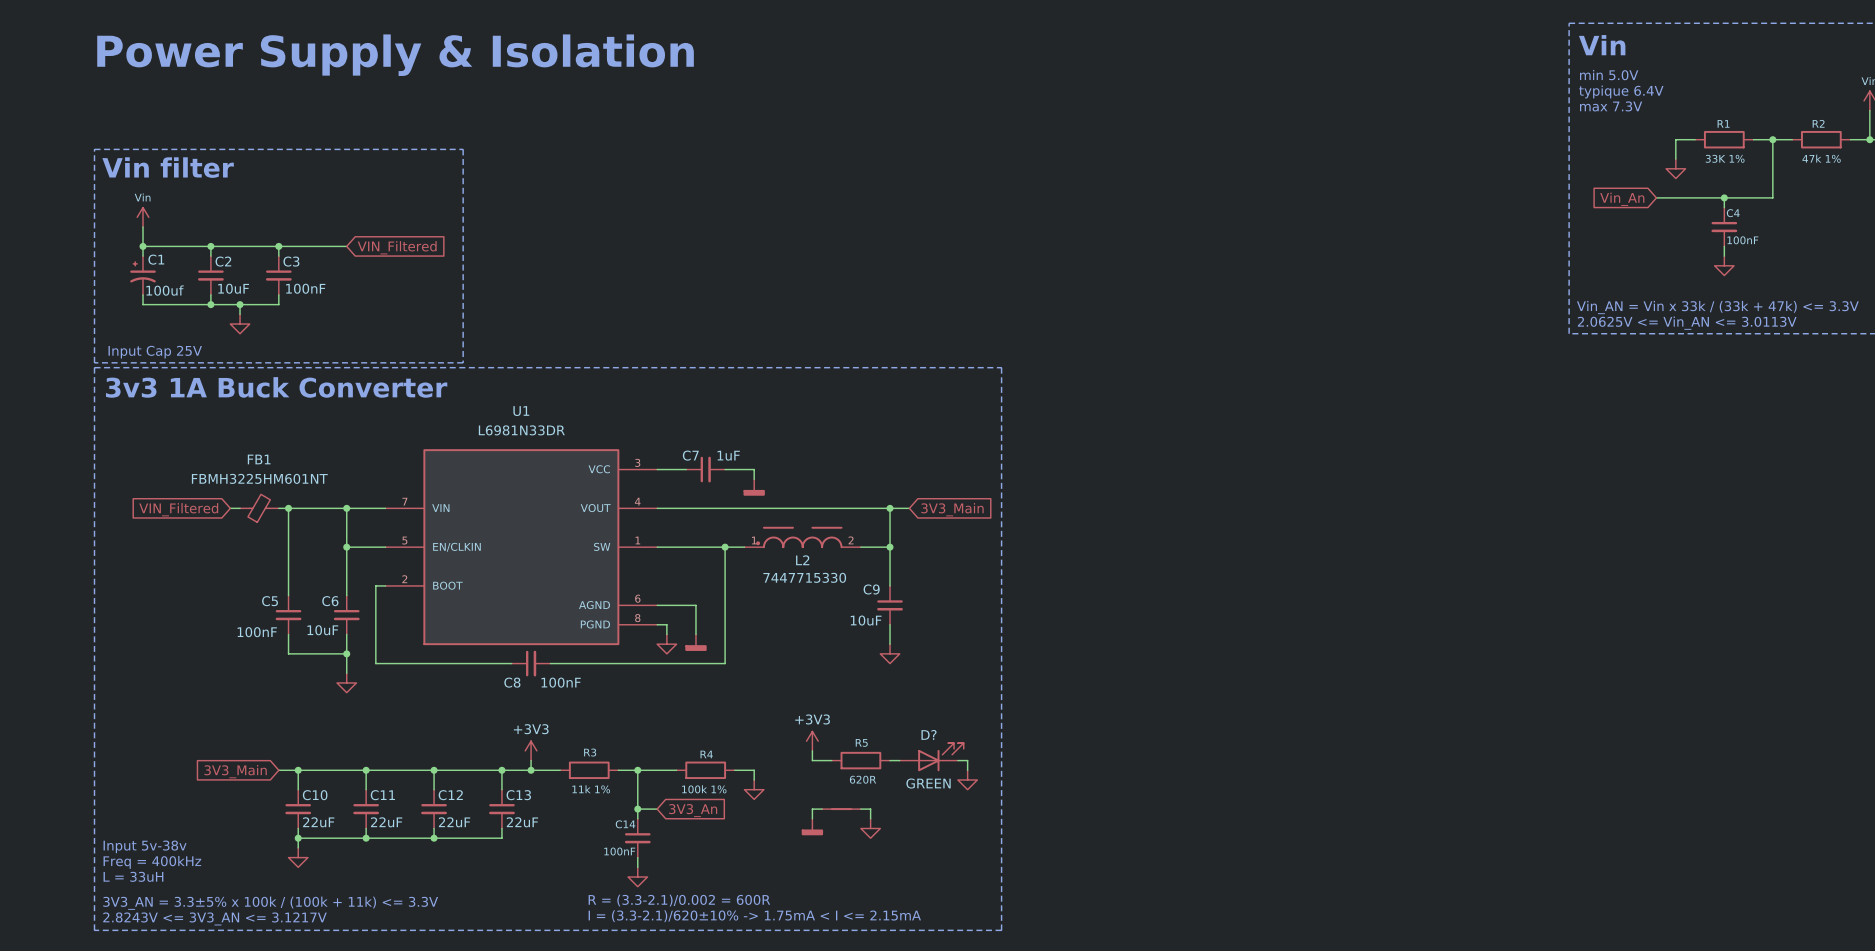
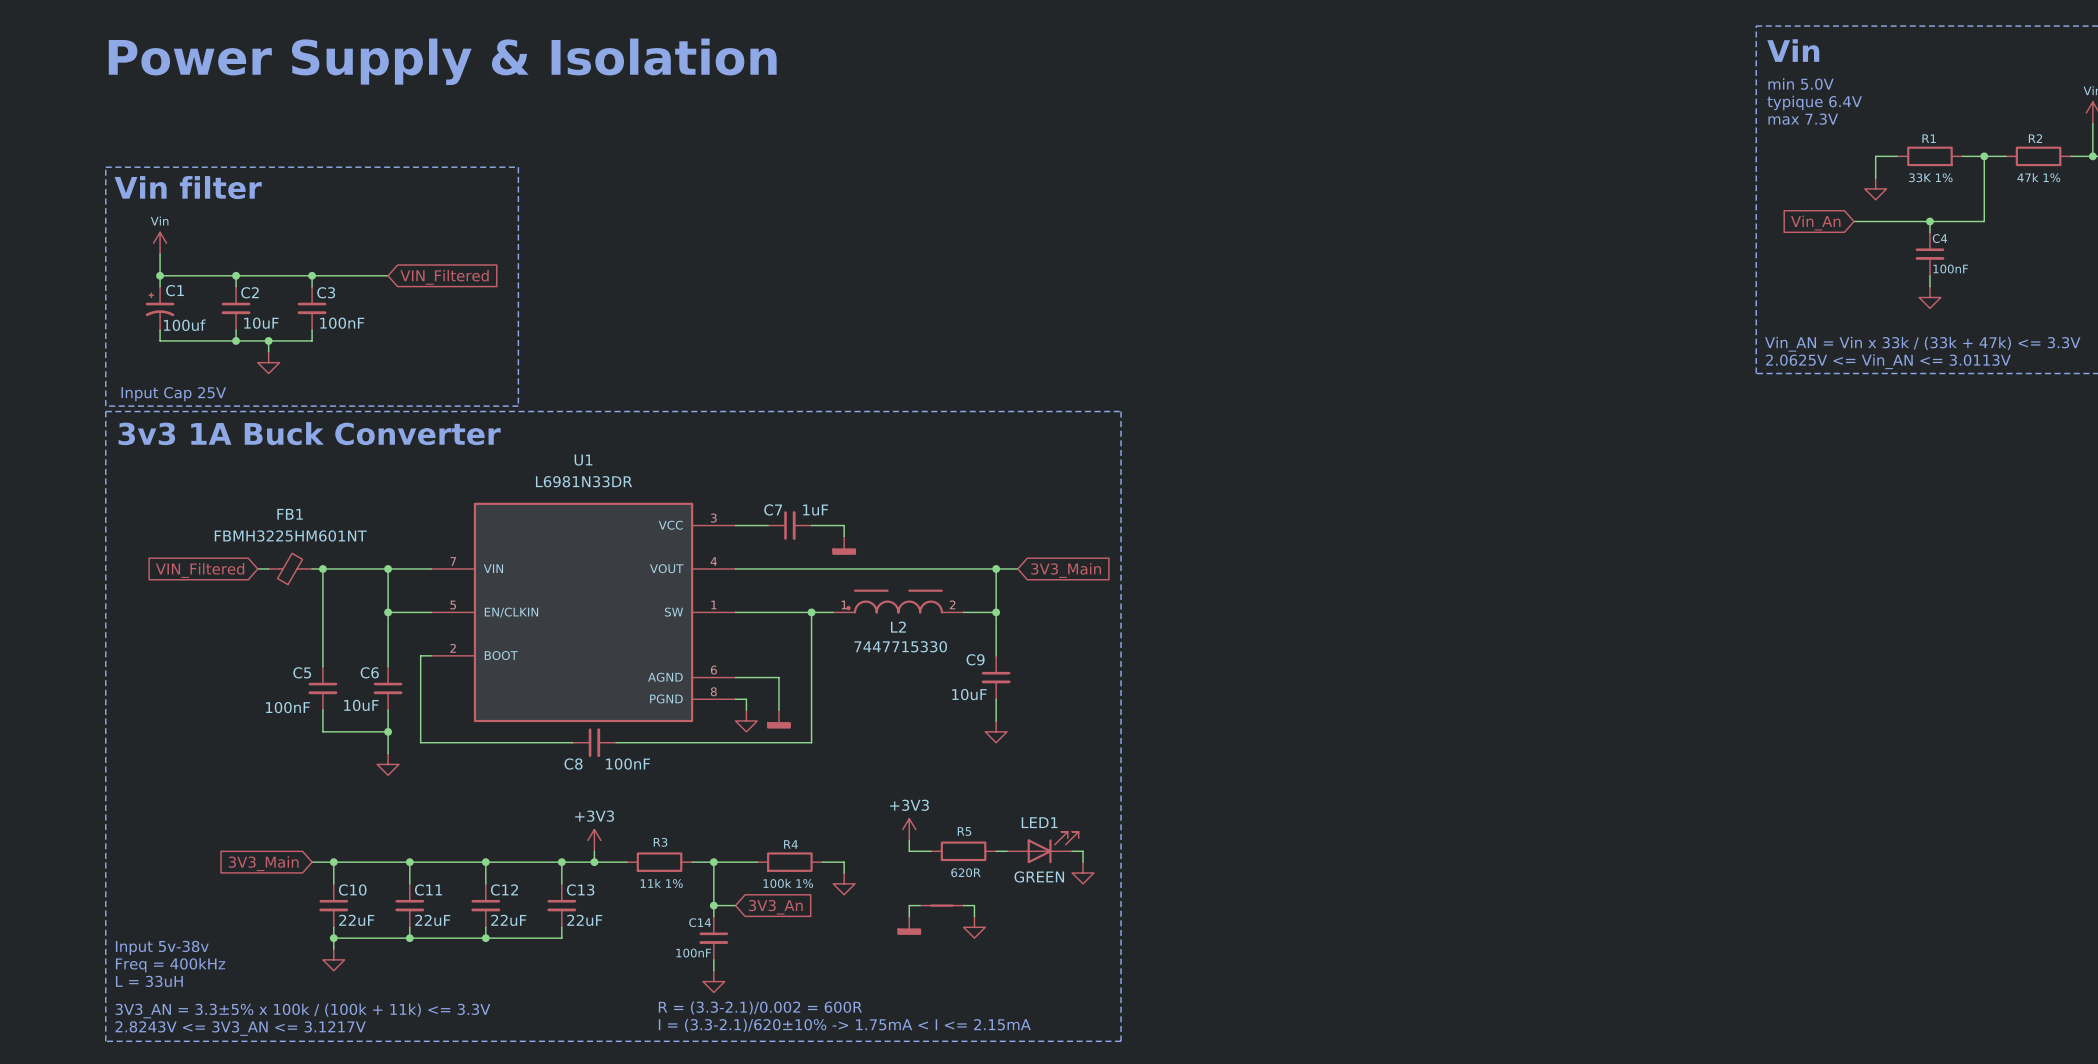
D? name: D? (929, 734) -> LED1 (1039, 822)

